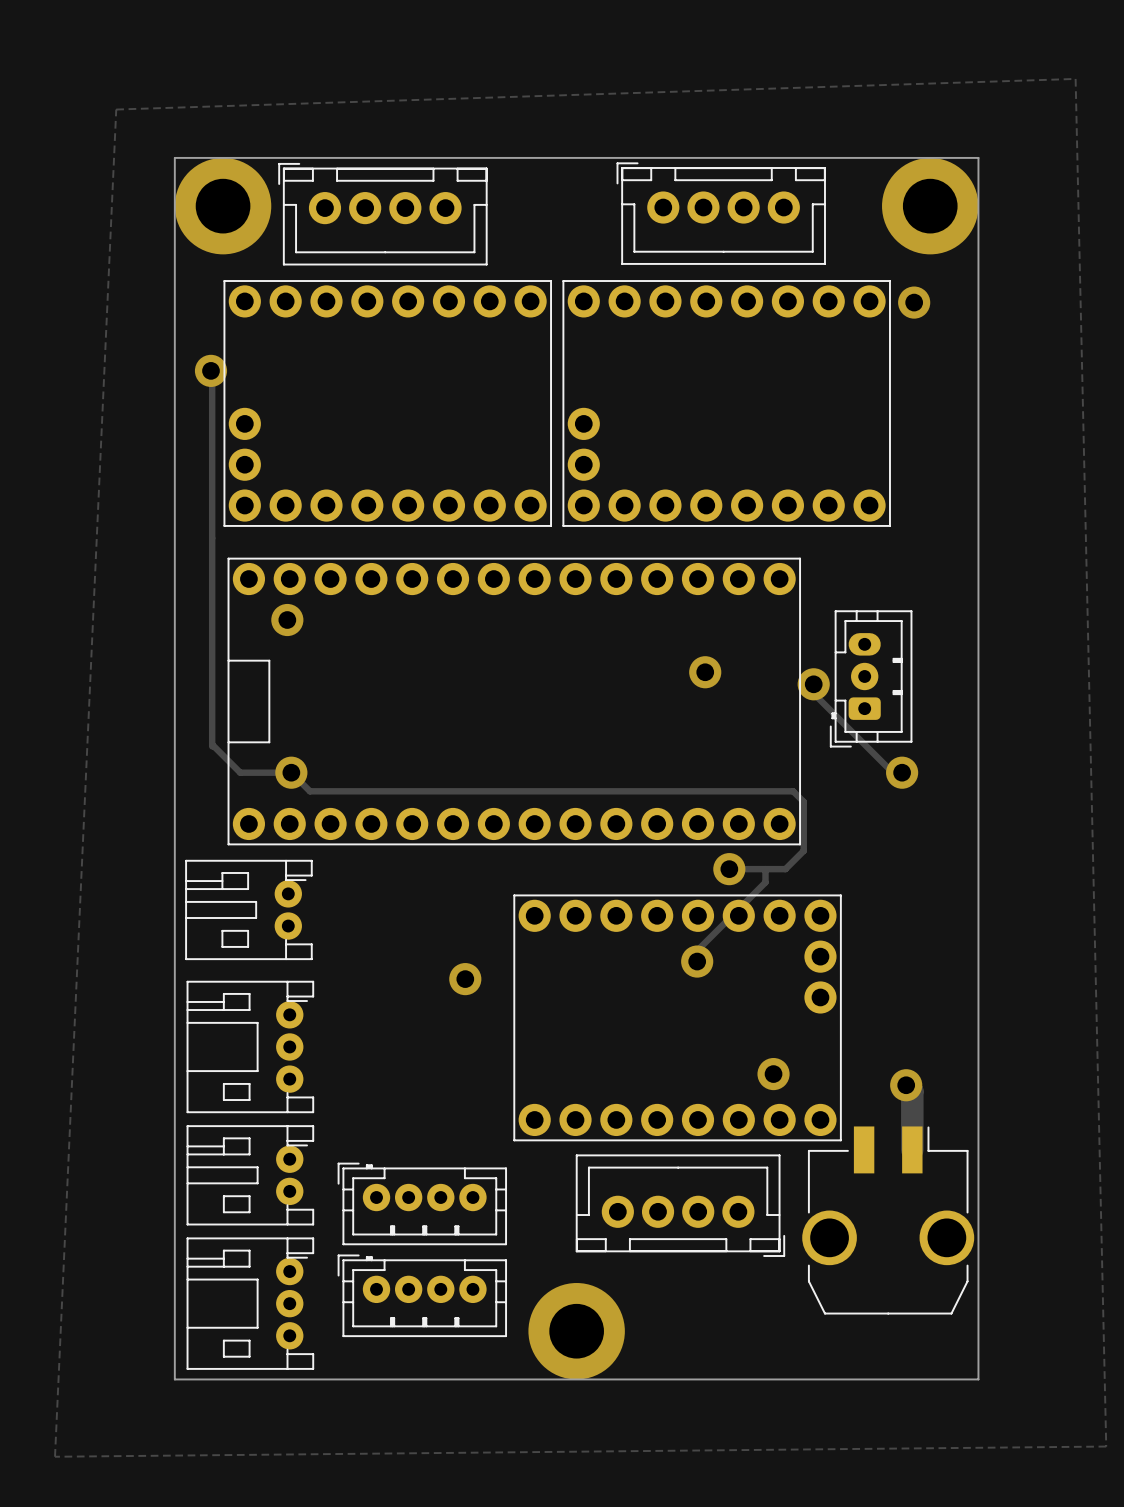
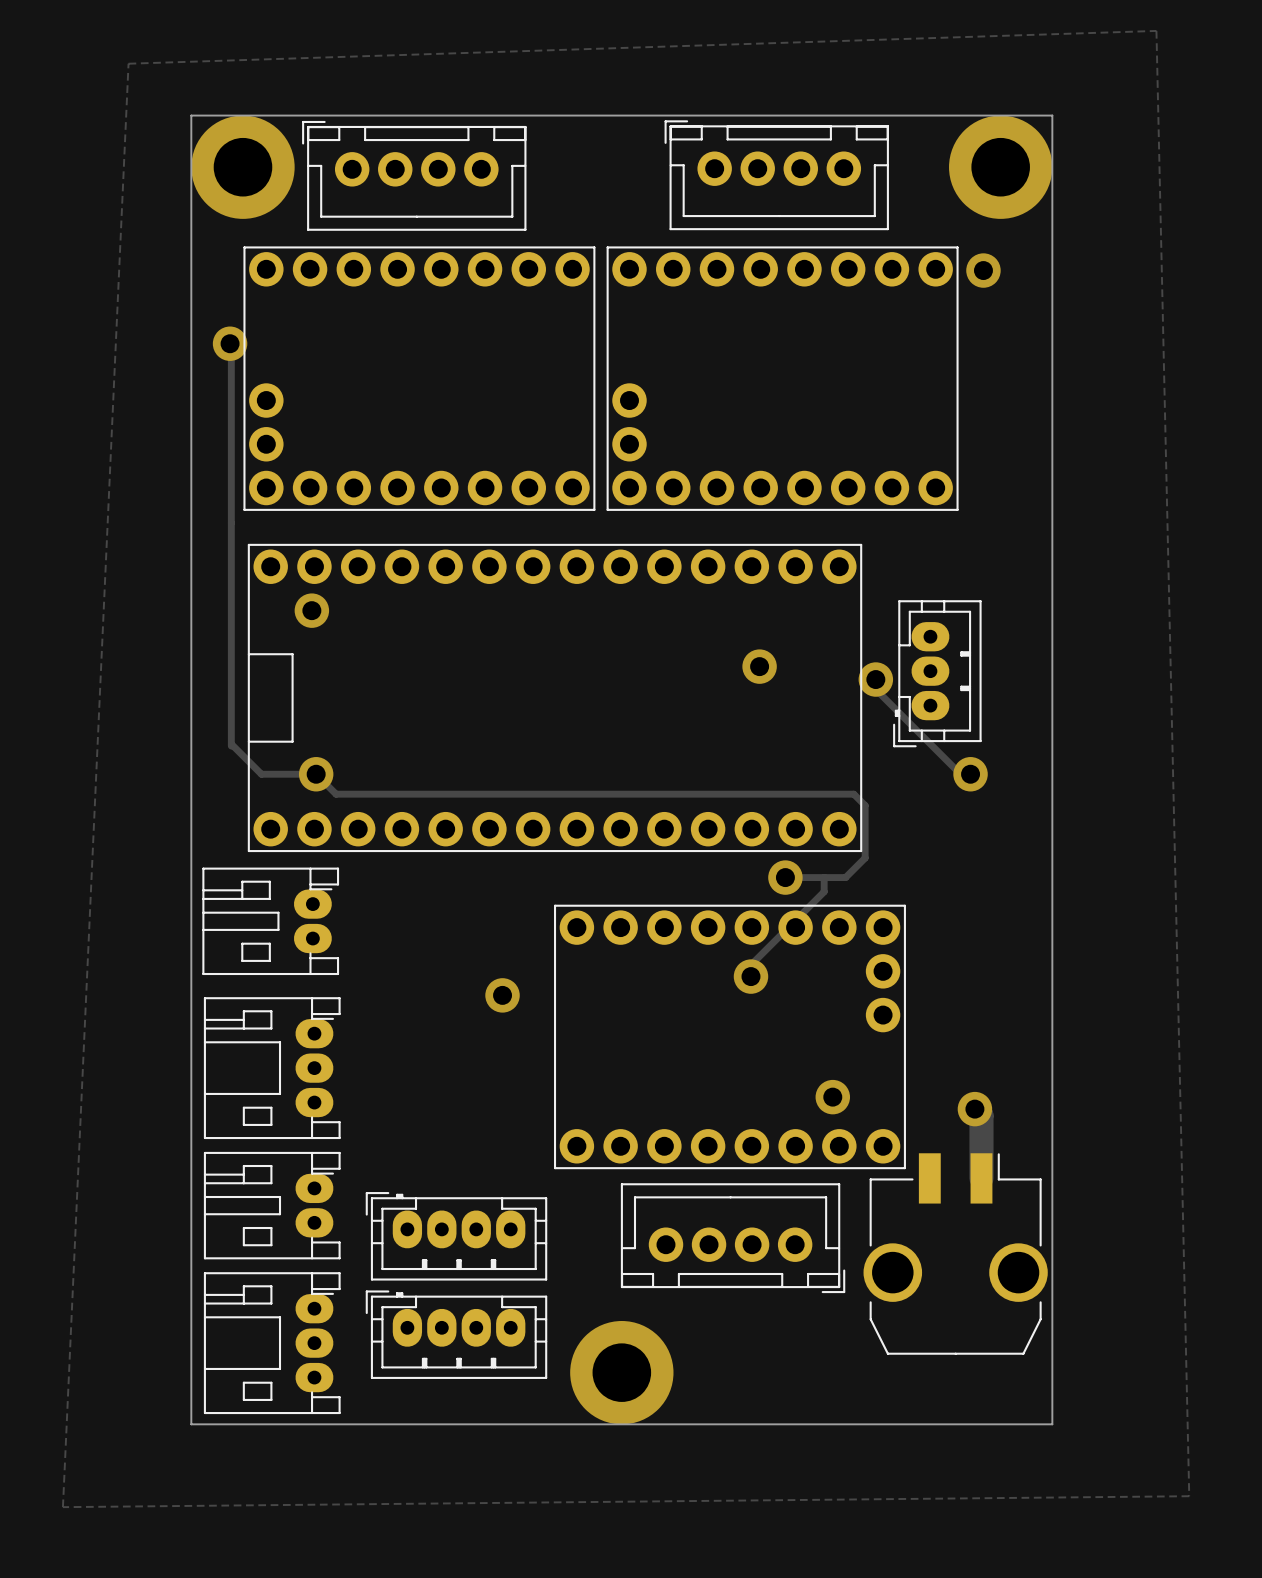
part footprint: [829, 610, 913, 748] -> [893, 600, 982, 748]
part footprint: [185, 859, 313, 961] -> [202, 867, 340, 976]
part footprint: [186, 980, 315, 1114] -> [203, 997, 341, 1140]
part footprint: [186, 1125, 315, 1226] -> [203, 1151, 341, 1260]
part footprint: [337, 1162, 508, 1246] -> [365, 1192, 548, 1281]
part footprint: [186, 1237, 315, 1370] -> [203, 1272, 341, 1415]
part footprint: [337, 1254, 508, 1338] -> [365, 1290, 548, 1379]

